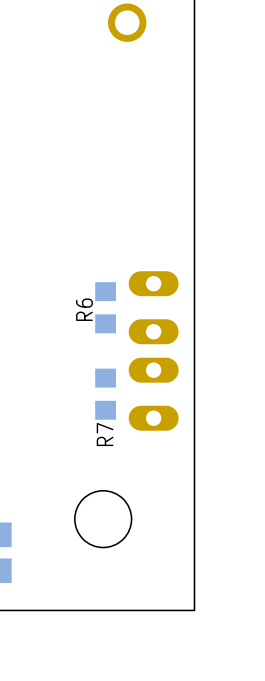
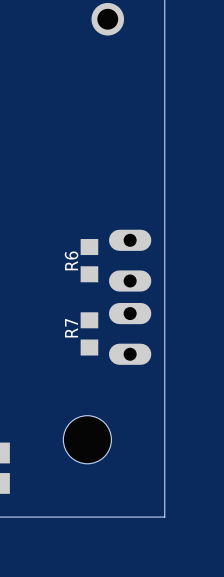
R7 name position: R7 (105, 434) -> R7 (71, 328)

